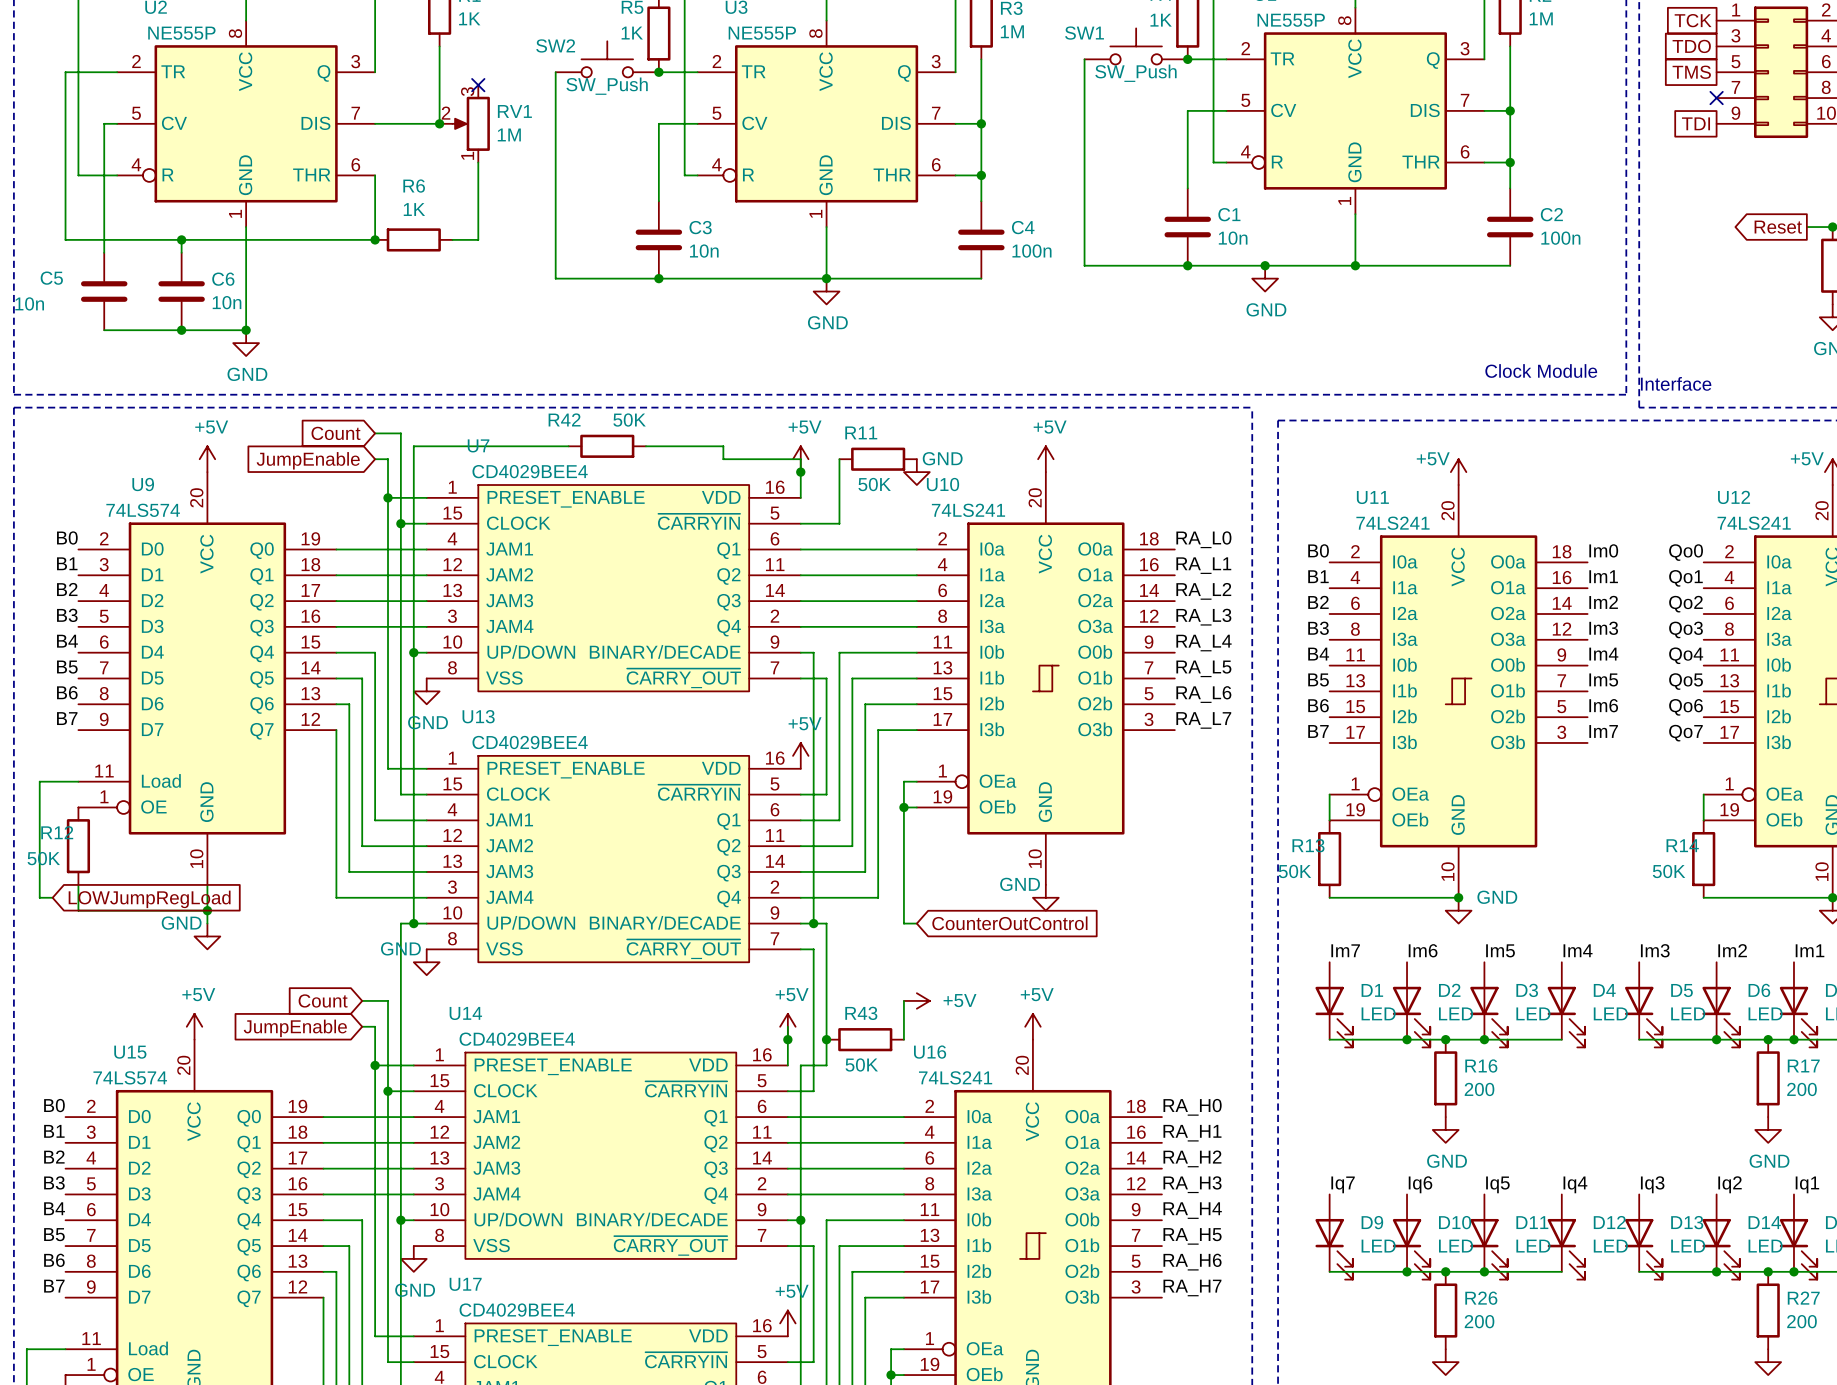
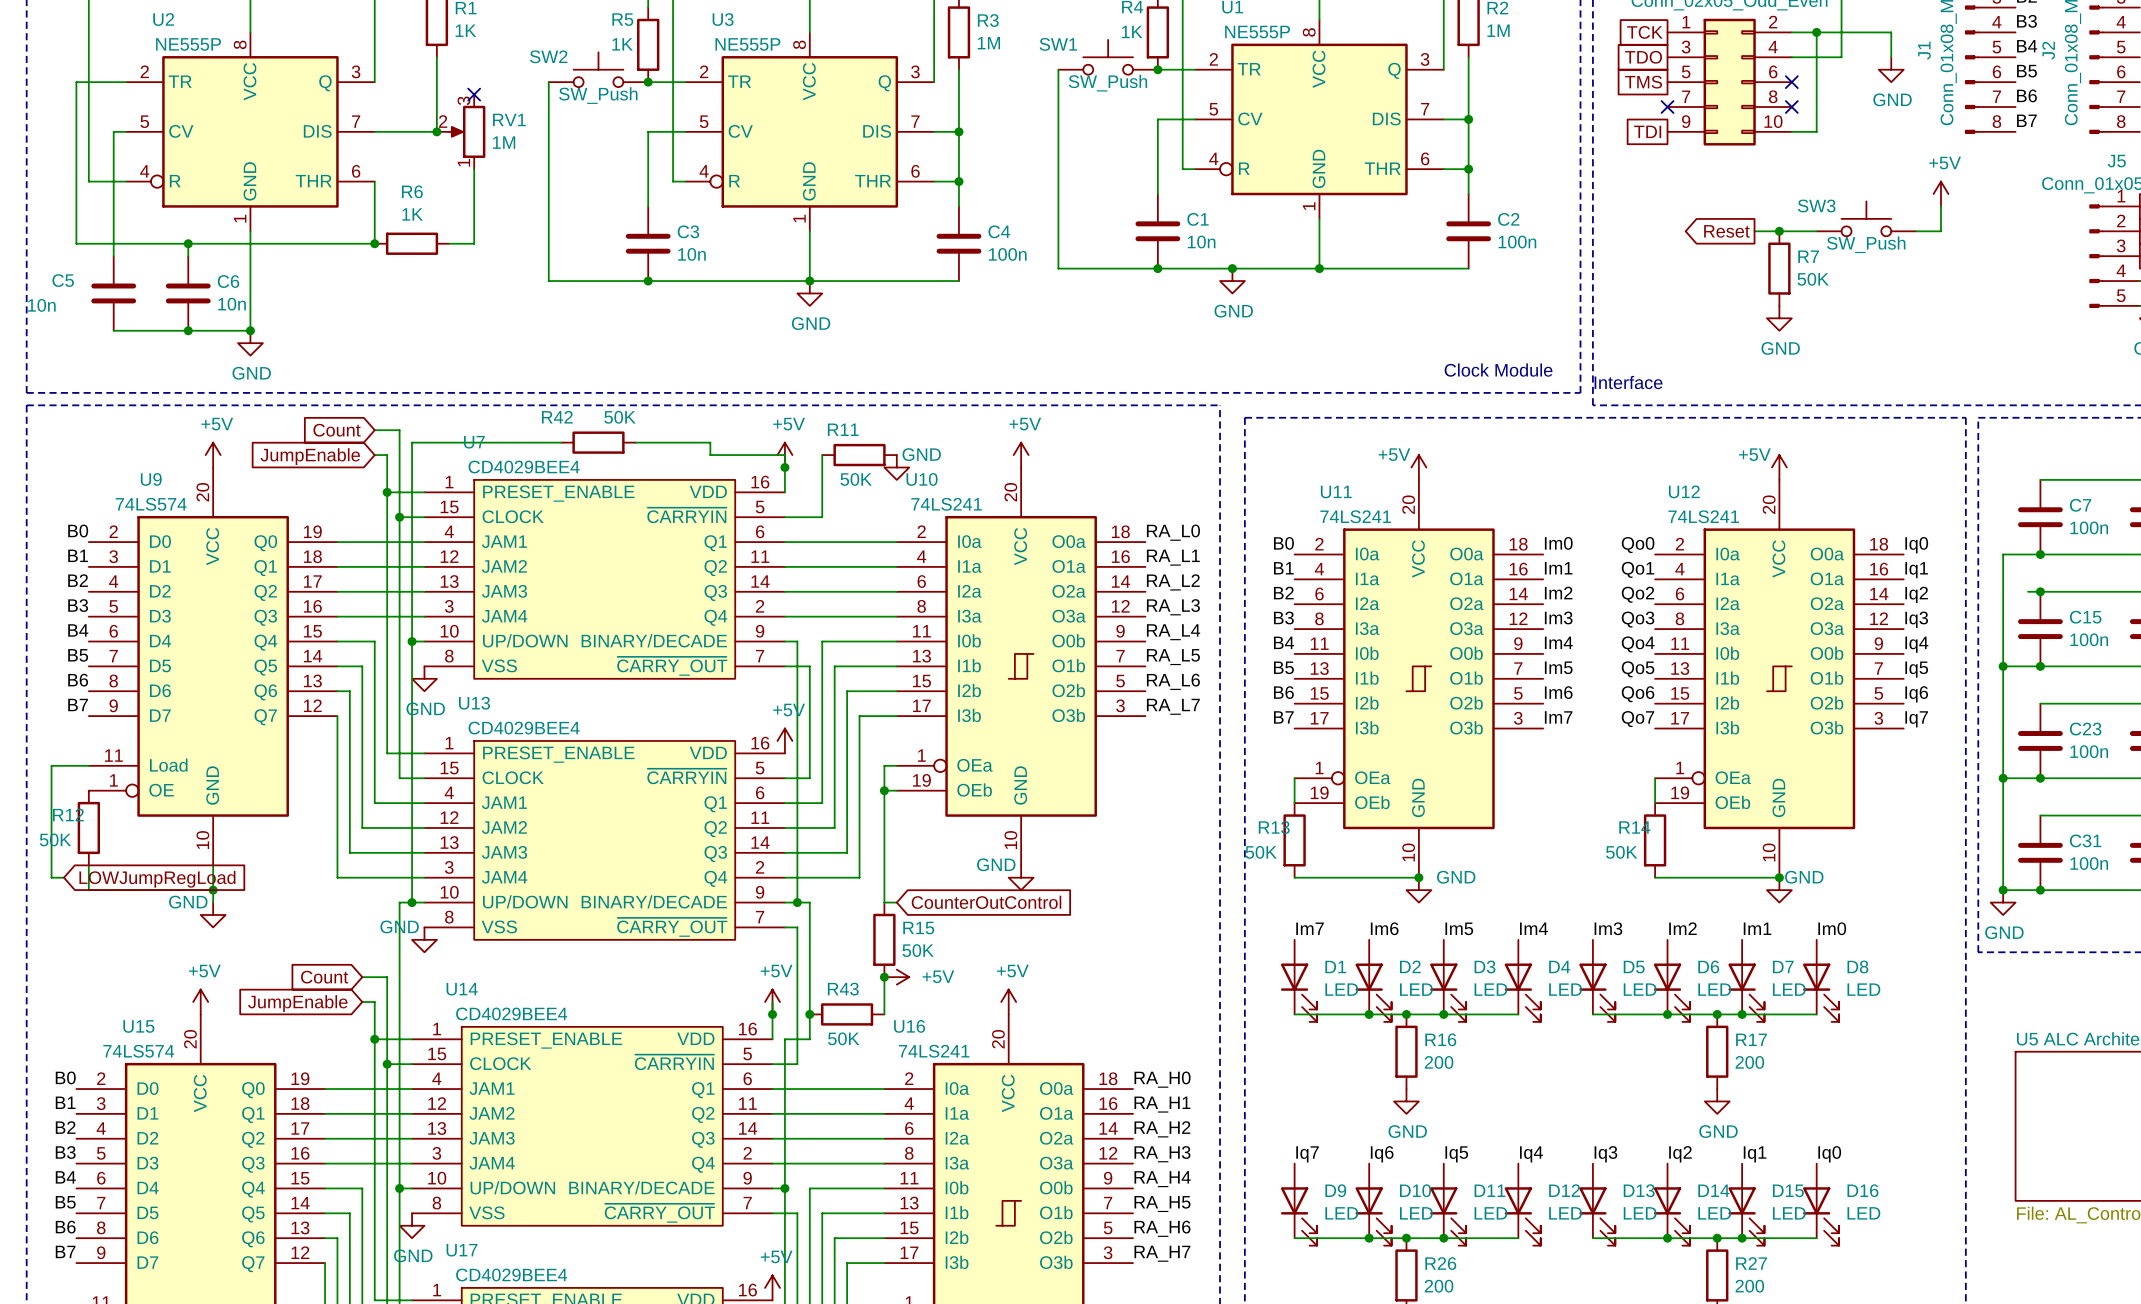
R15: none -> 50K (884, 939)
junction: none -> (884, 977)

